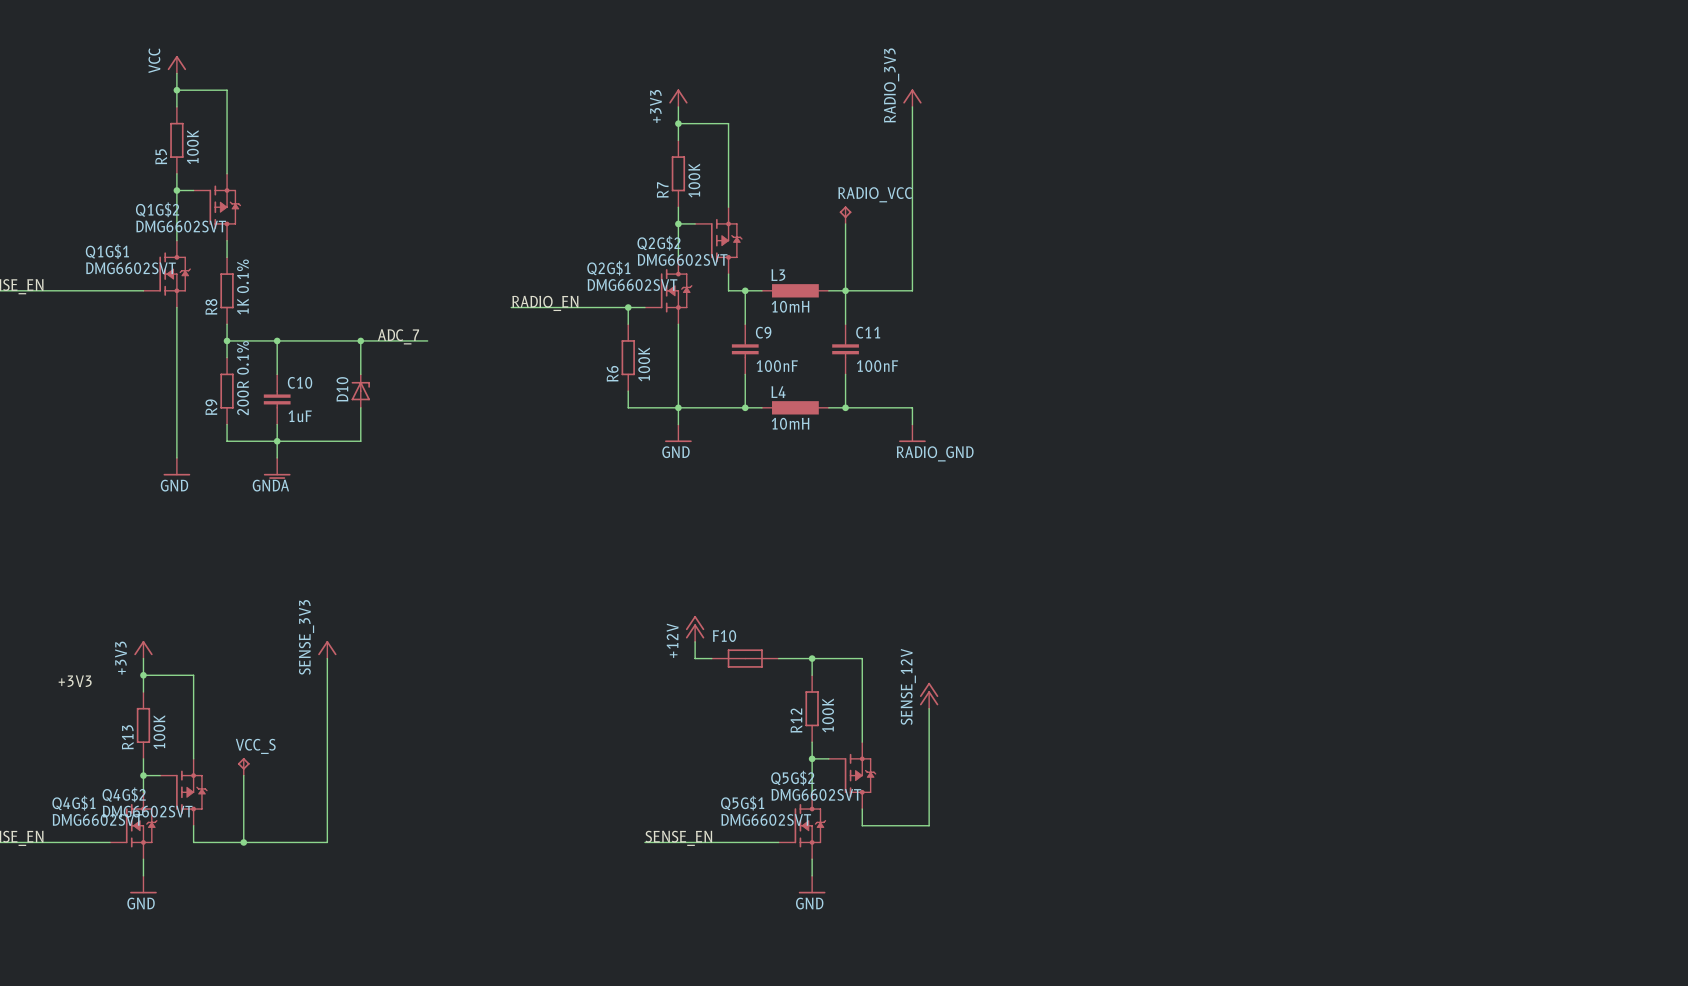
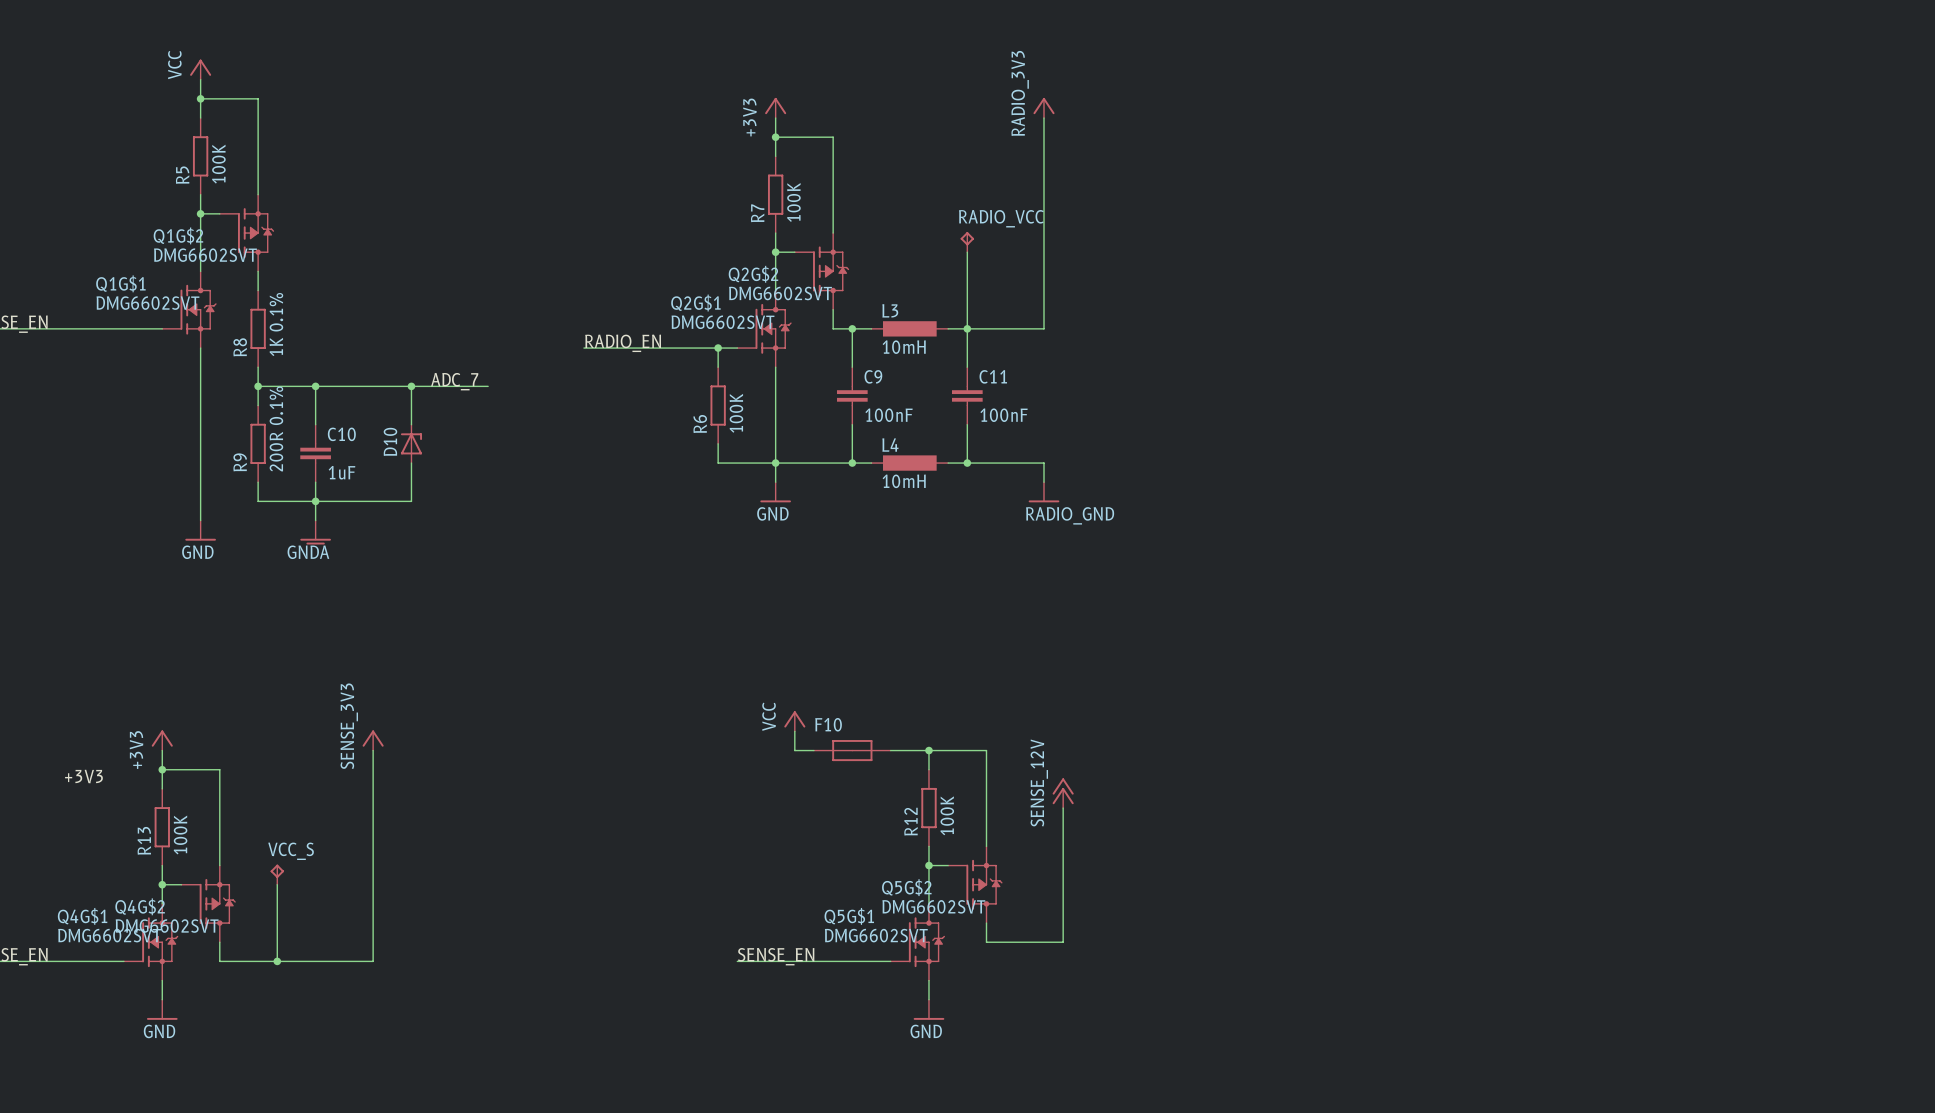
power symbol: +12V (695, 628) -> VCC (794, 721)

